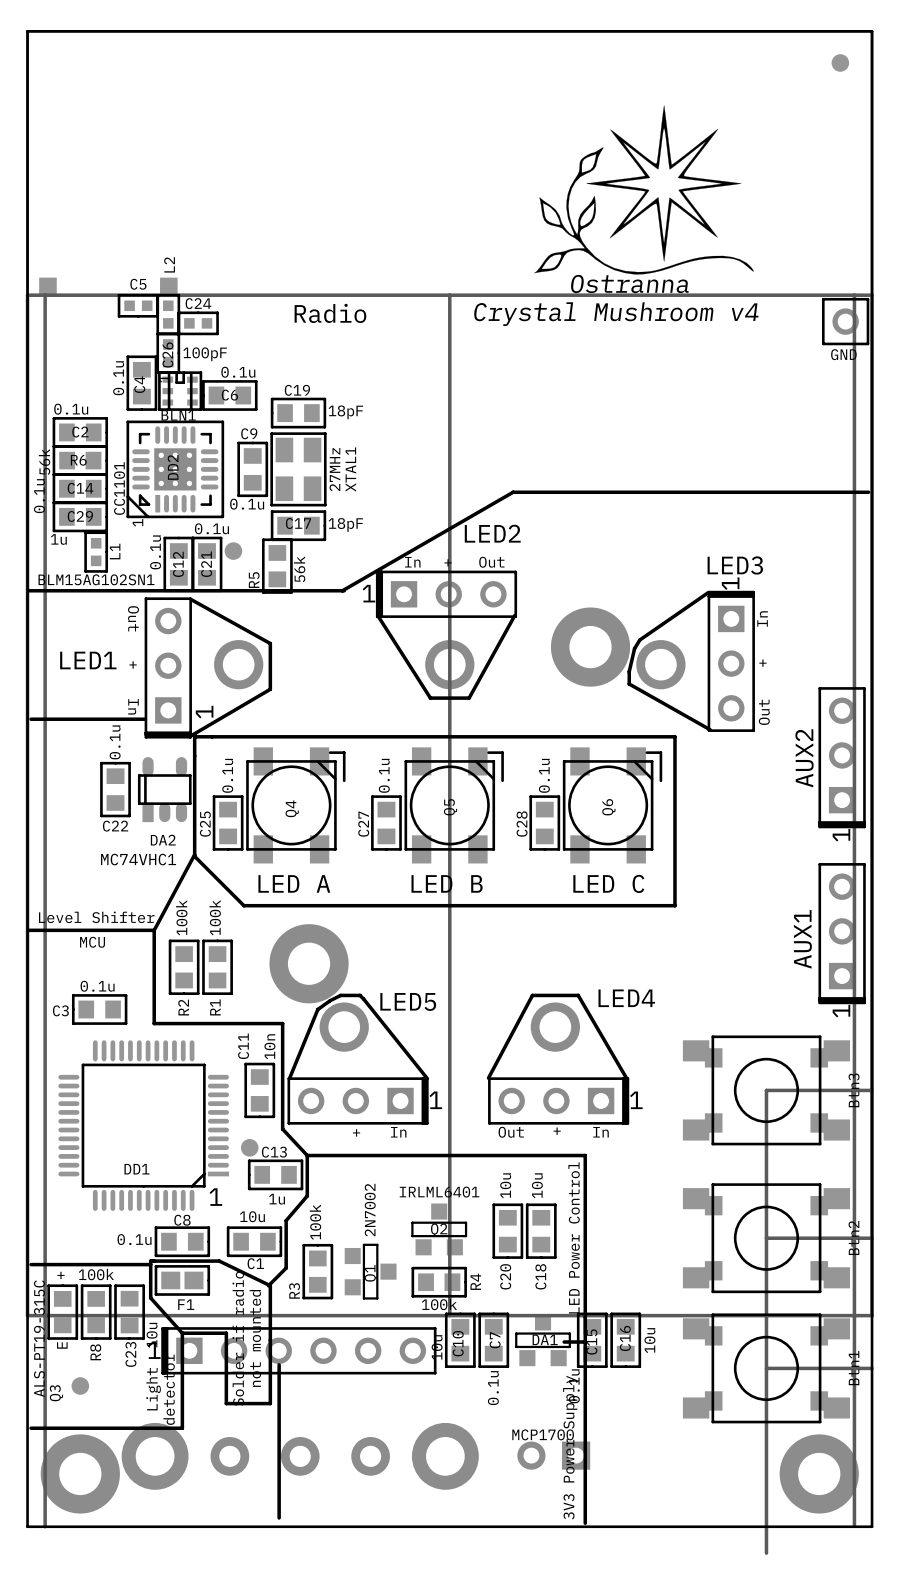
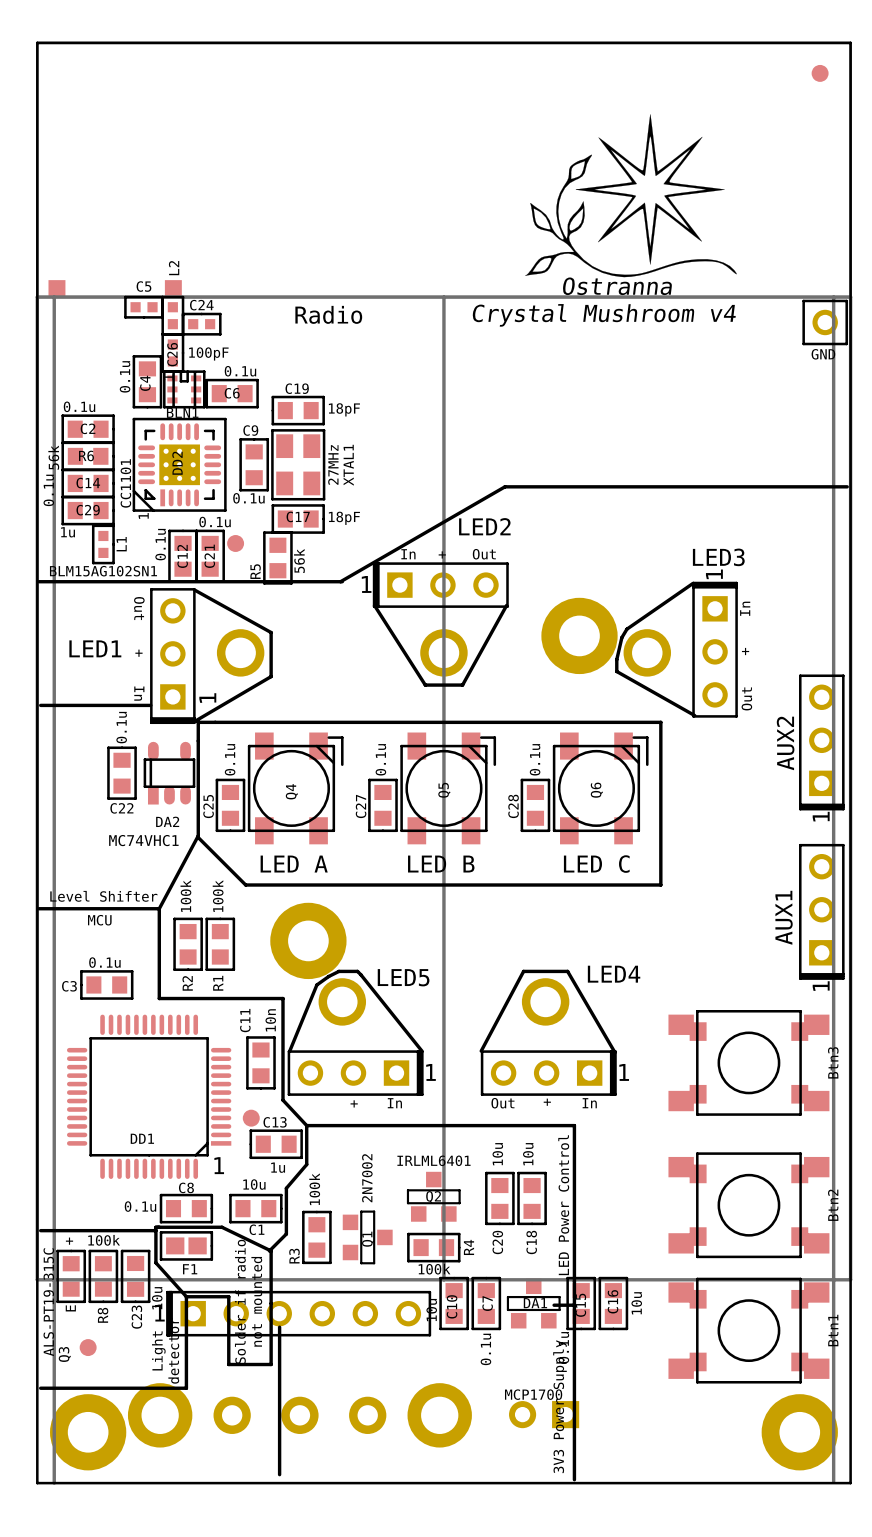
line: (872, 1090) (766, 1090) (766, 1553) -> none
line: (766, 1238) (872, 1238) -> none
line: (766, 1368) (872, 1368) -> none

